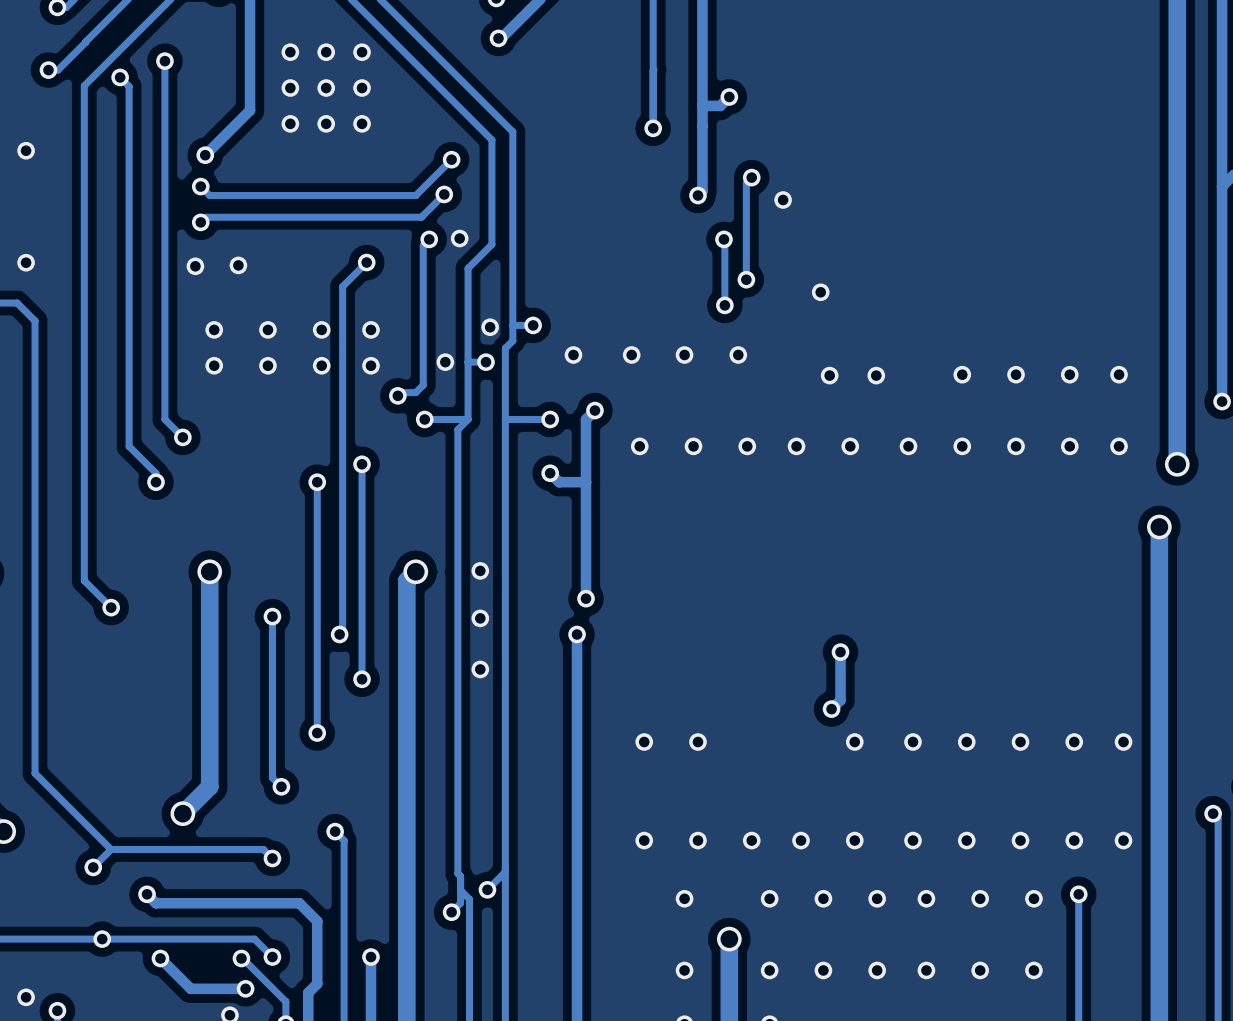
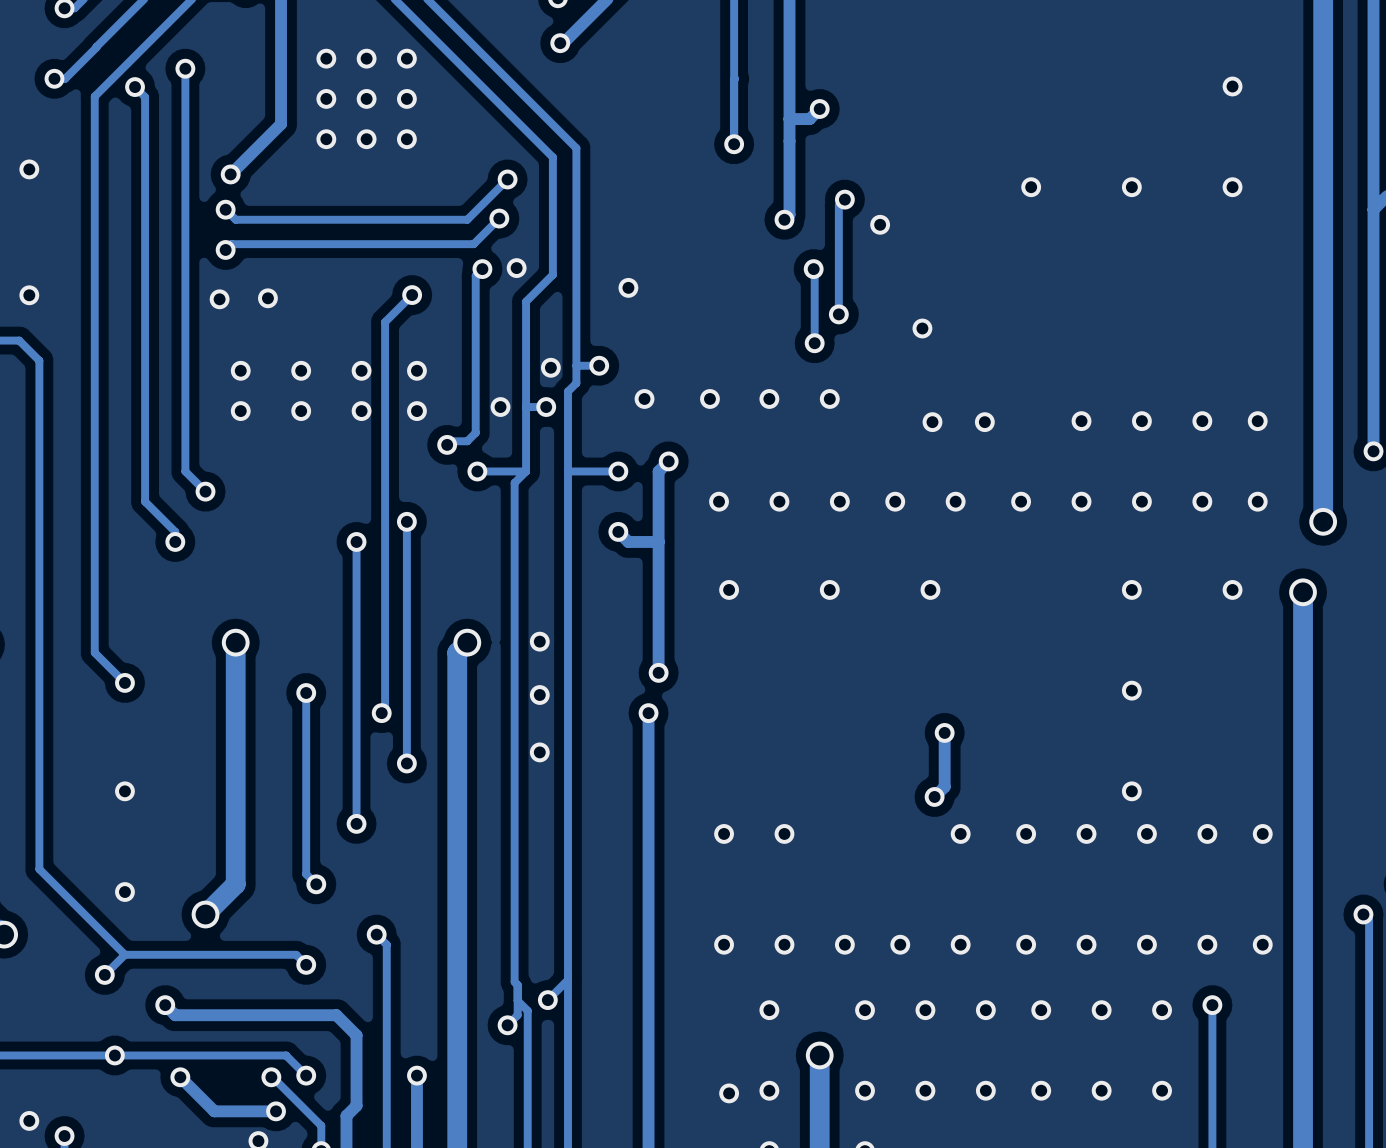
via: none -> (1232, 86)
via: none -> (1031, 187)
via: none -> (1131, 187)
via: none -> (1232, 187)
via: none -> (628, 287)
via: none -> (729, 589)
via: none -> (829, 589)
via: none -> (930, 589)
via: none -> (1131, 589)
via: none -> (1232, 589)
via: none -> (1131, 690)
via: none -> (124, 791)
via: none -> (1131, 791)
via: none -> (124, 892)
via: none -> (729, 1093)

